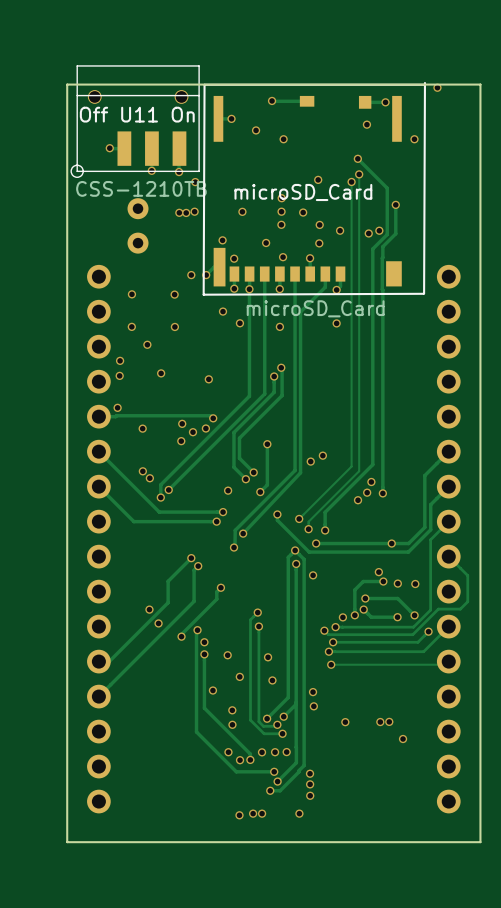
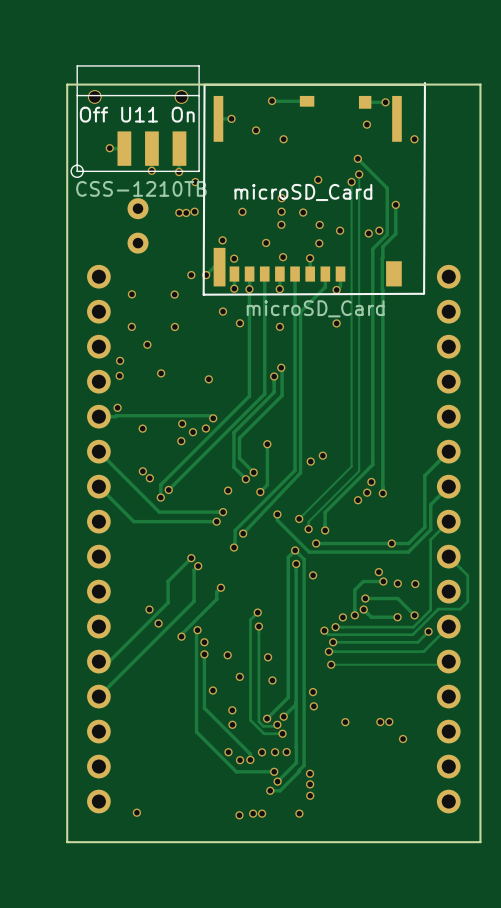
via: (437, 87) -> none
via: none -> (136, 812)

